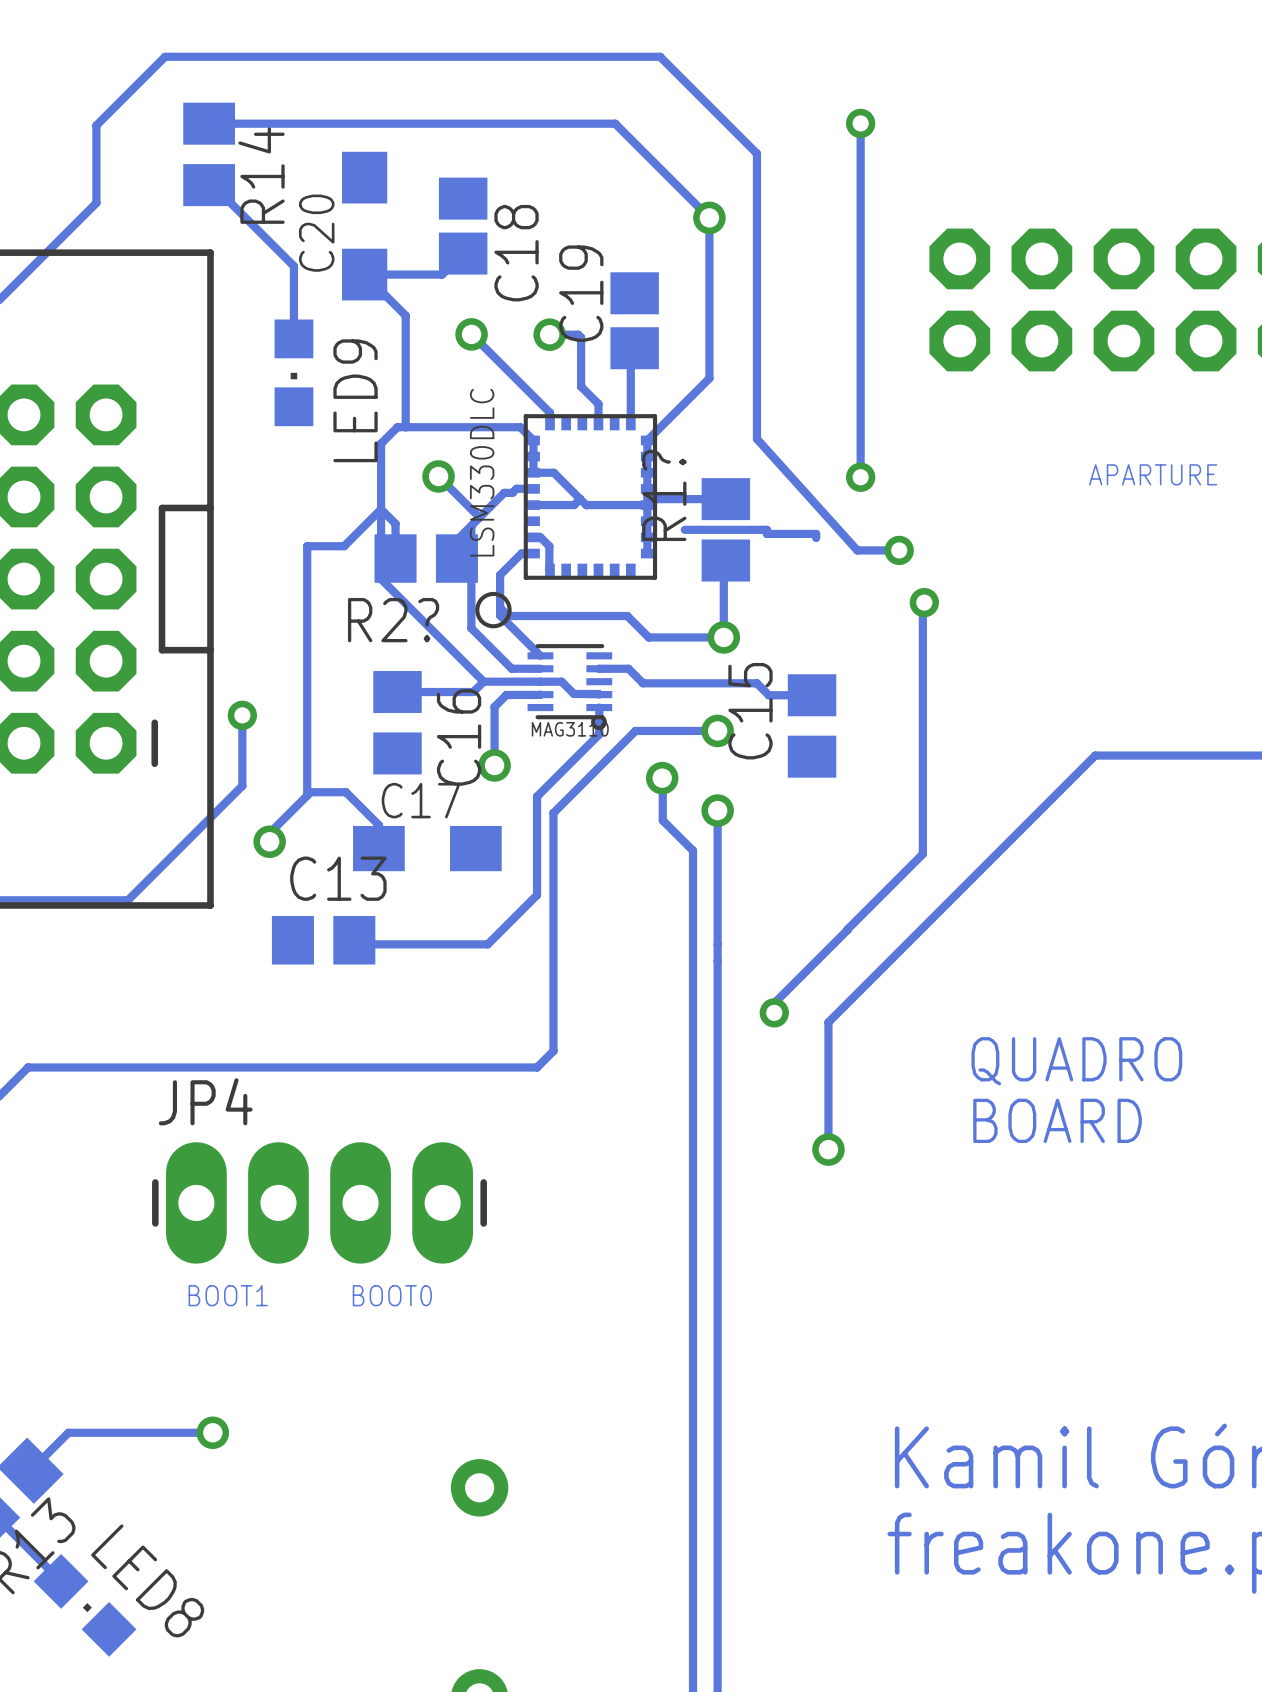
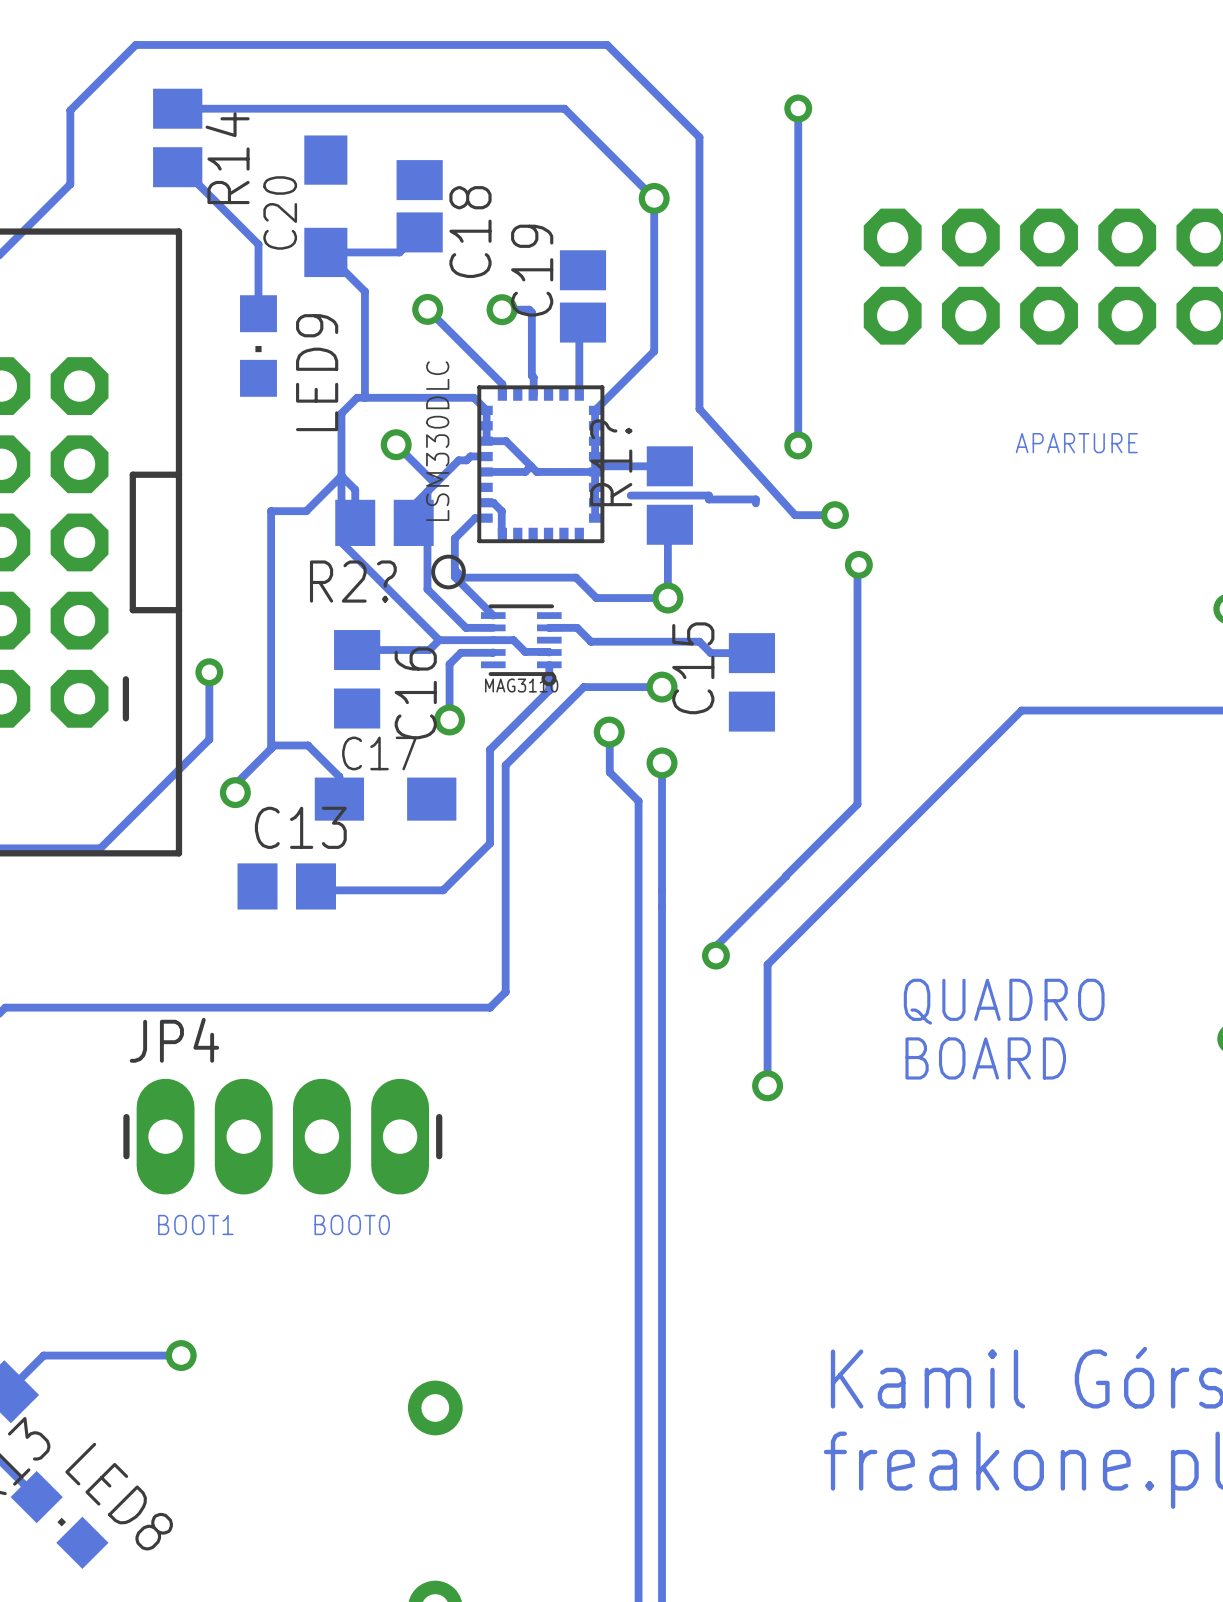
track: (581, 337) (581, 386) (598, 404) (598, 423) -> (531, 312) (533, 394)

